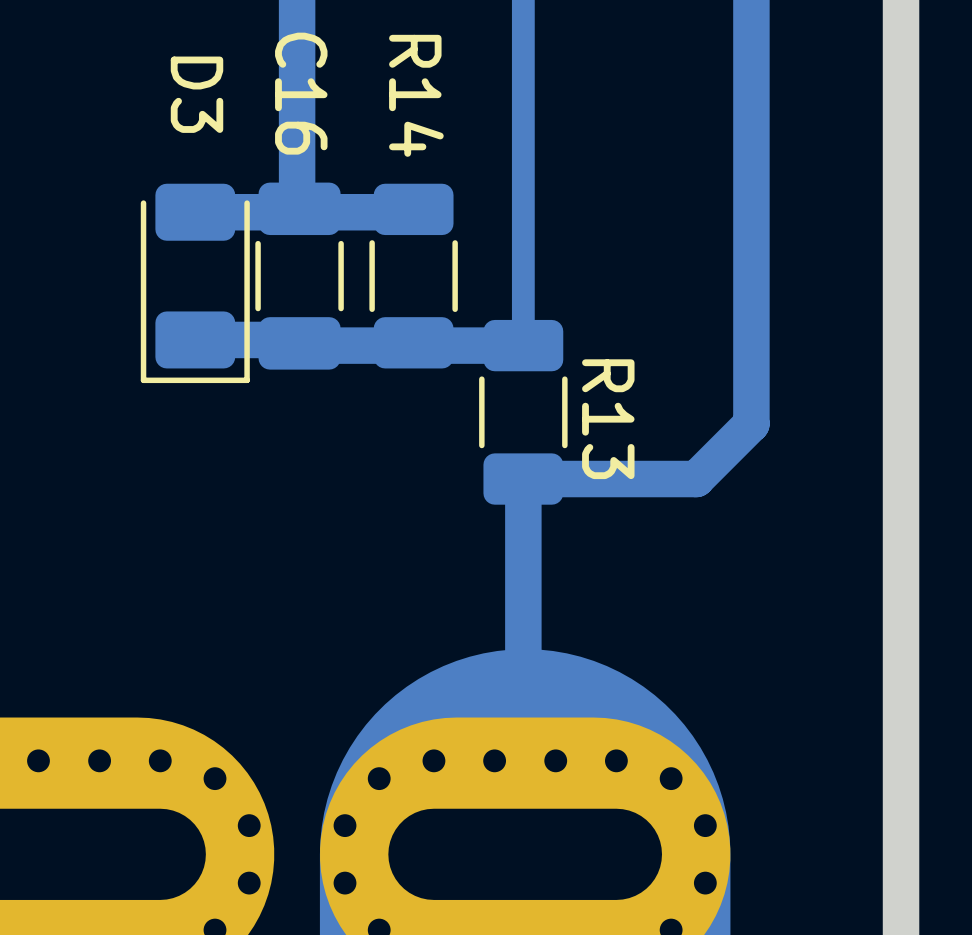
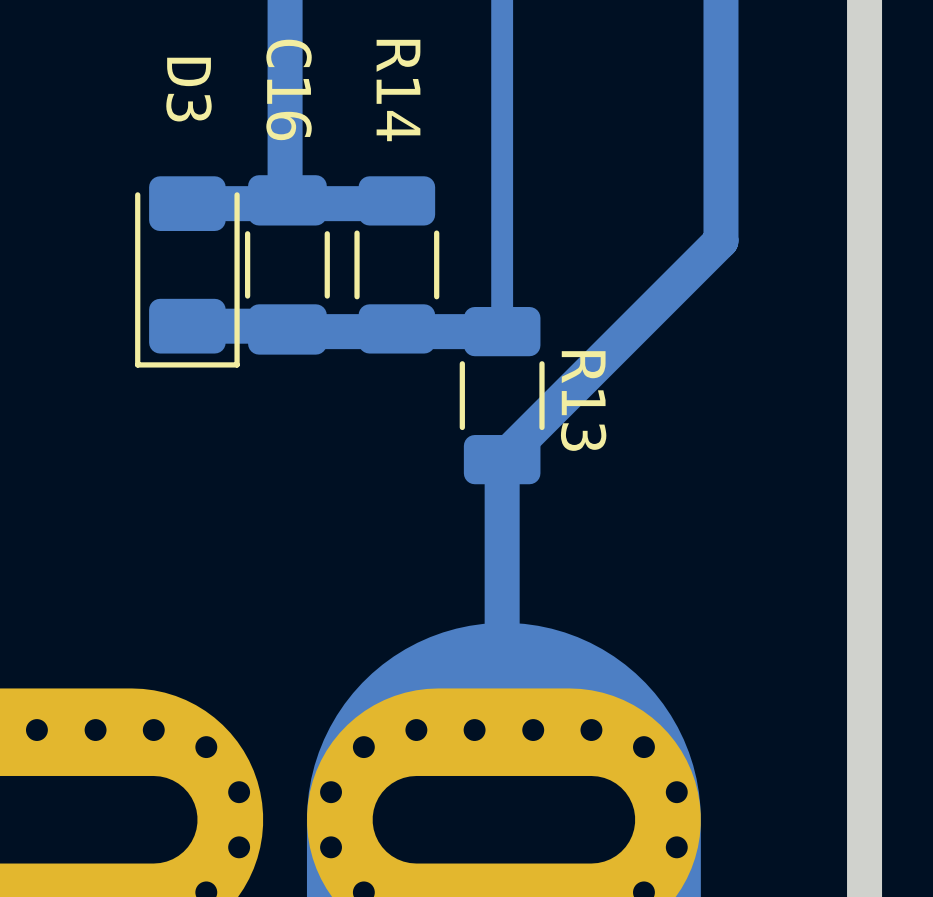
track: (751, 250) (751, 423) (696, 479) (523, 479) -> (720, 240) (502, 459)

